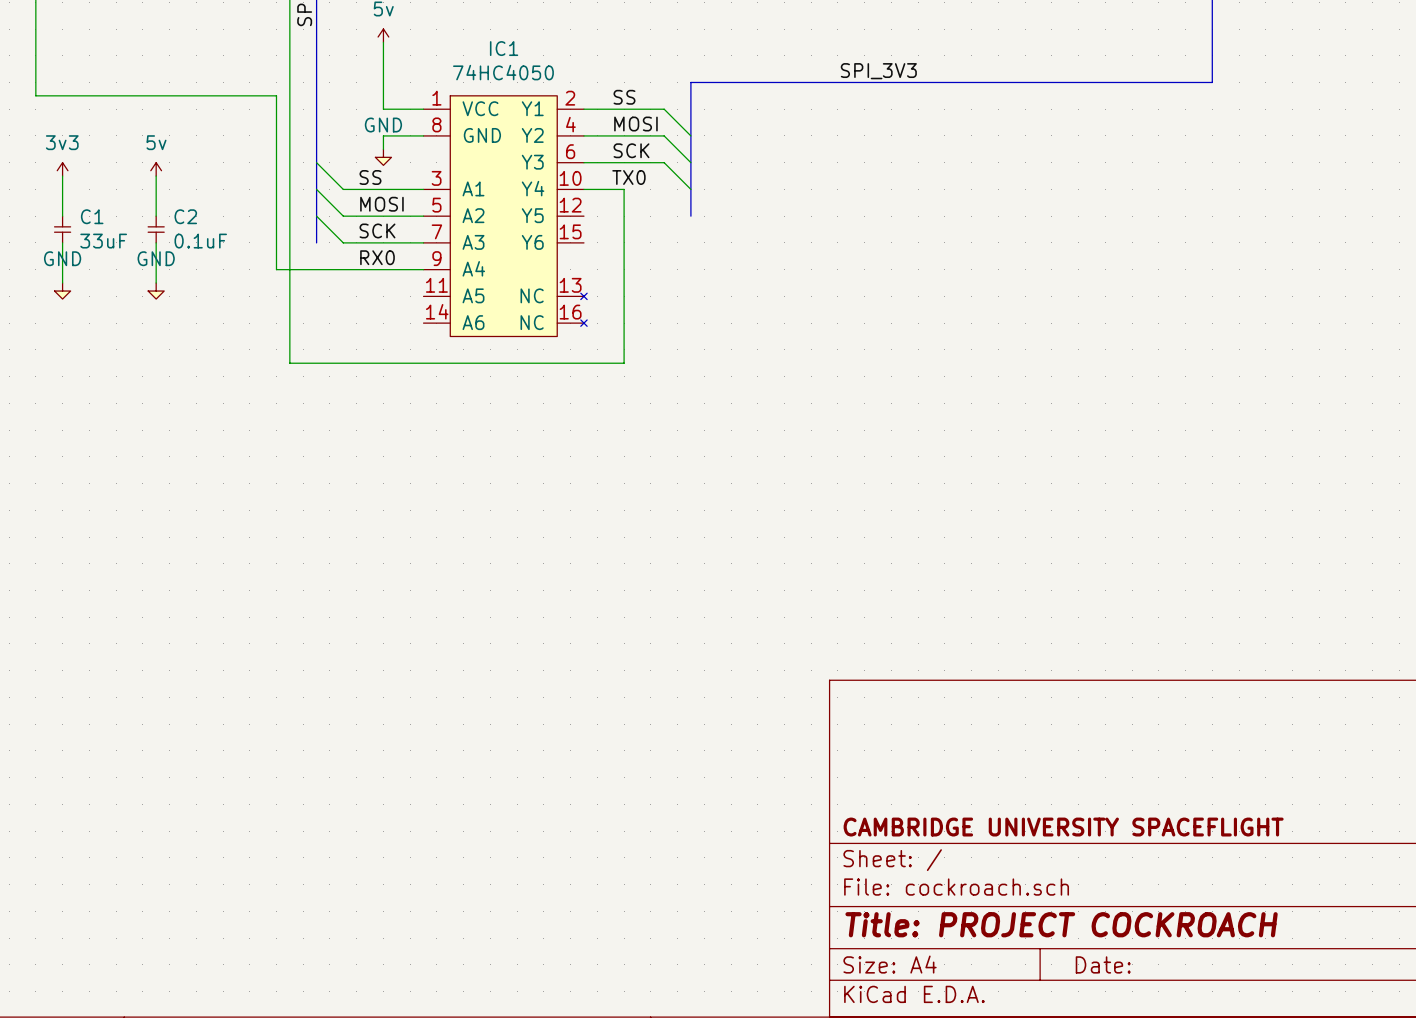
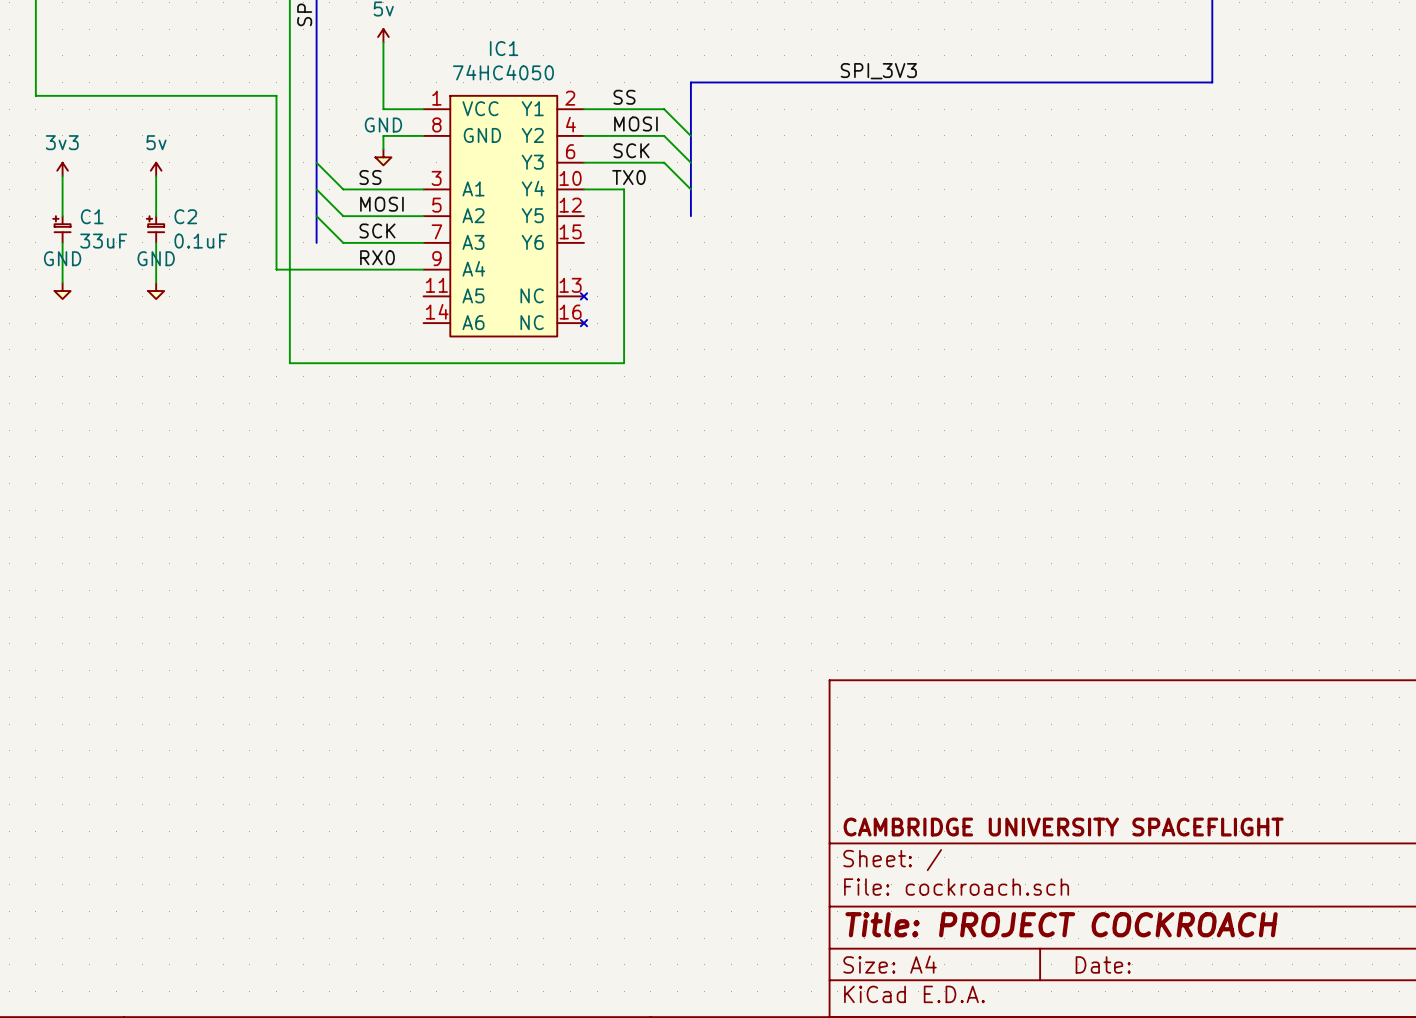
C1 symbol: [54, 216, 71, 243] -> [53, 216, 71, 243]
C2 symbol: [148, 216, 165, 243] -> [146, 216, 165, 243]

